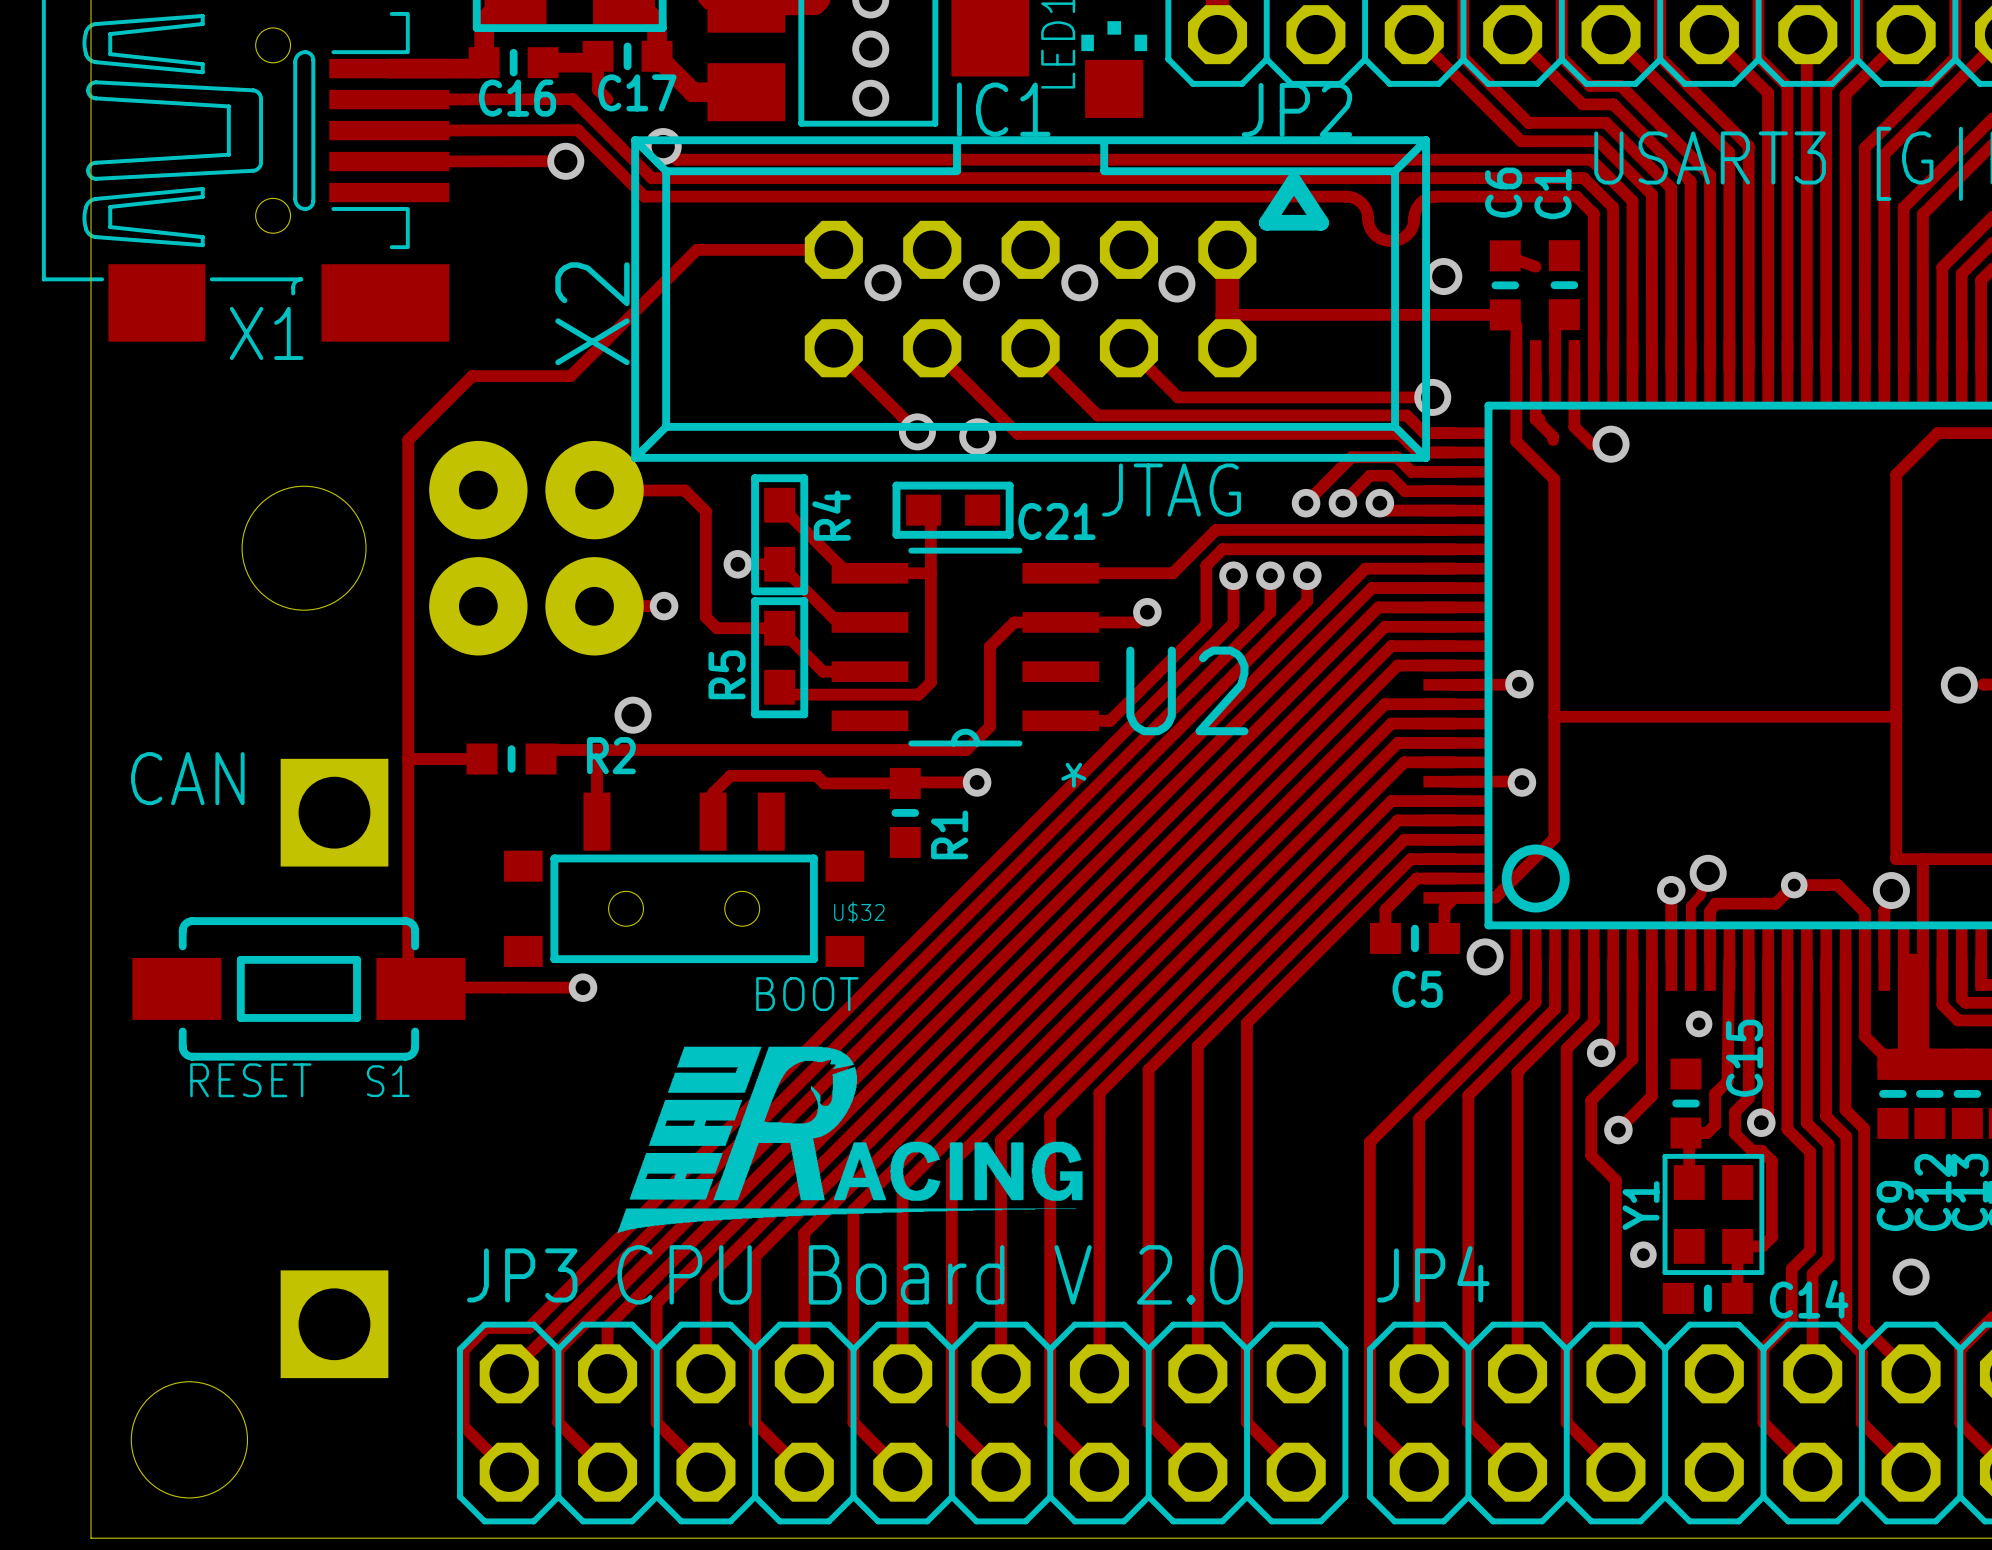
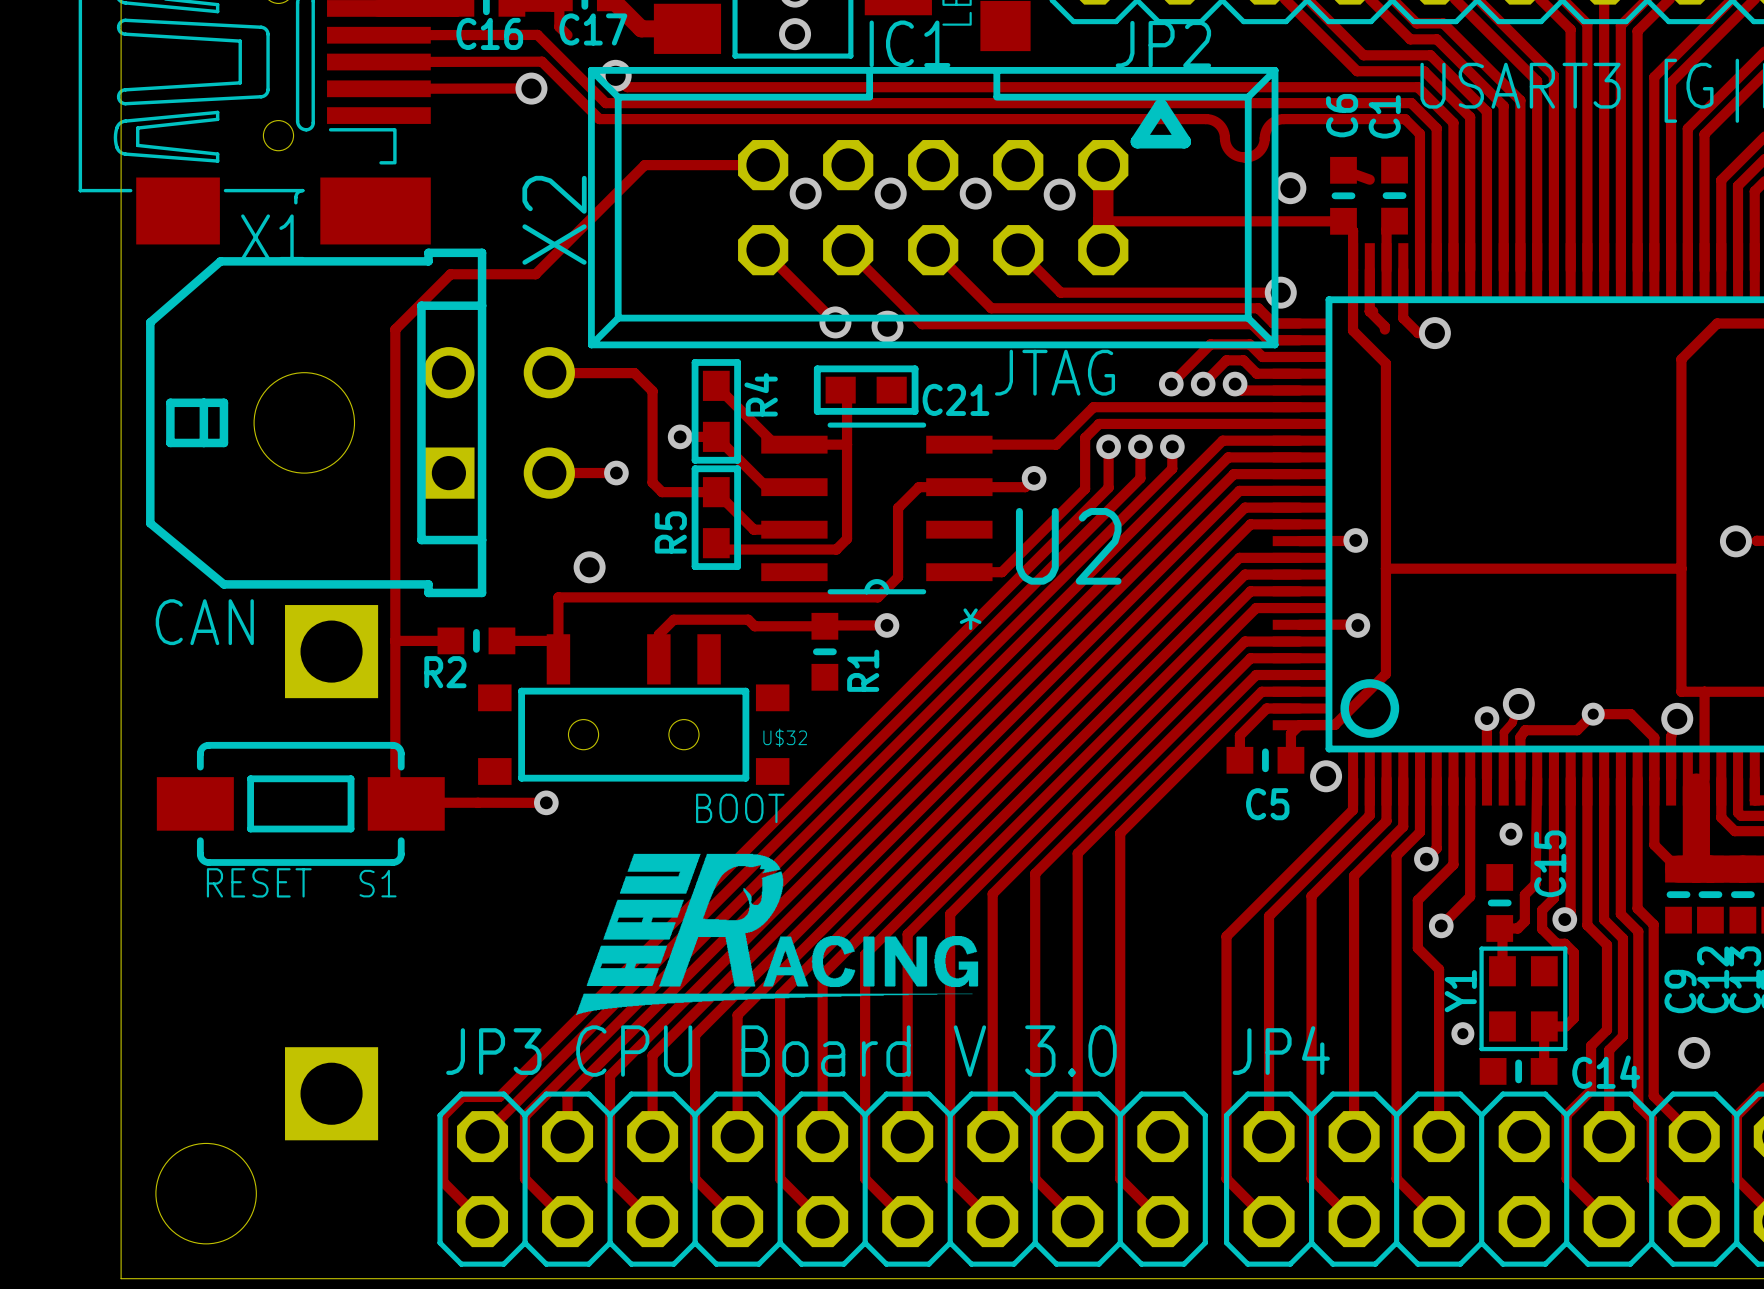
part: none -> (360, 422)
part: (442, 548) -> none
track: (596, 749) (541, 749) (541, 759) -> none
R2 name position: R2 (611, 755) -> R2 (445, 672)
track: (408, 759) (482, 759) -> none
R2 position: (511, 759) -> (476, 640)
track: none -> (395, 640) (450, 640)
track: none -> (501, 640) (556, 640) (558, 642)
text: CPU Board V 2.0 (930, 1274) -> CPU Board V 3.0 (846, 1051)

